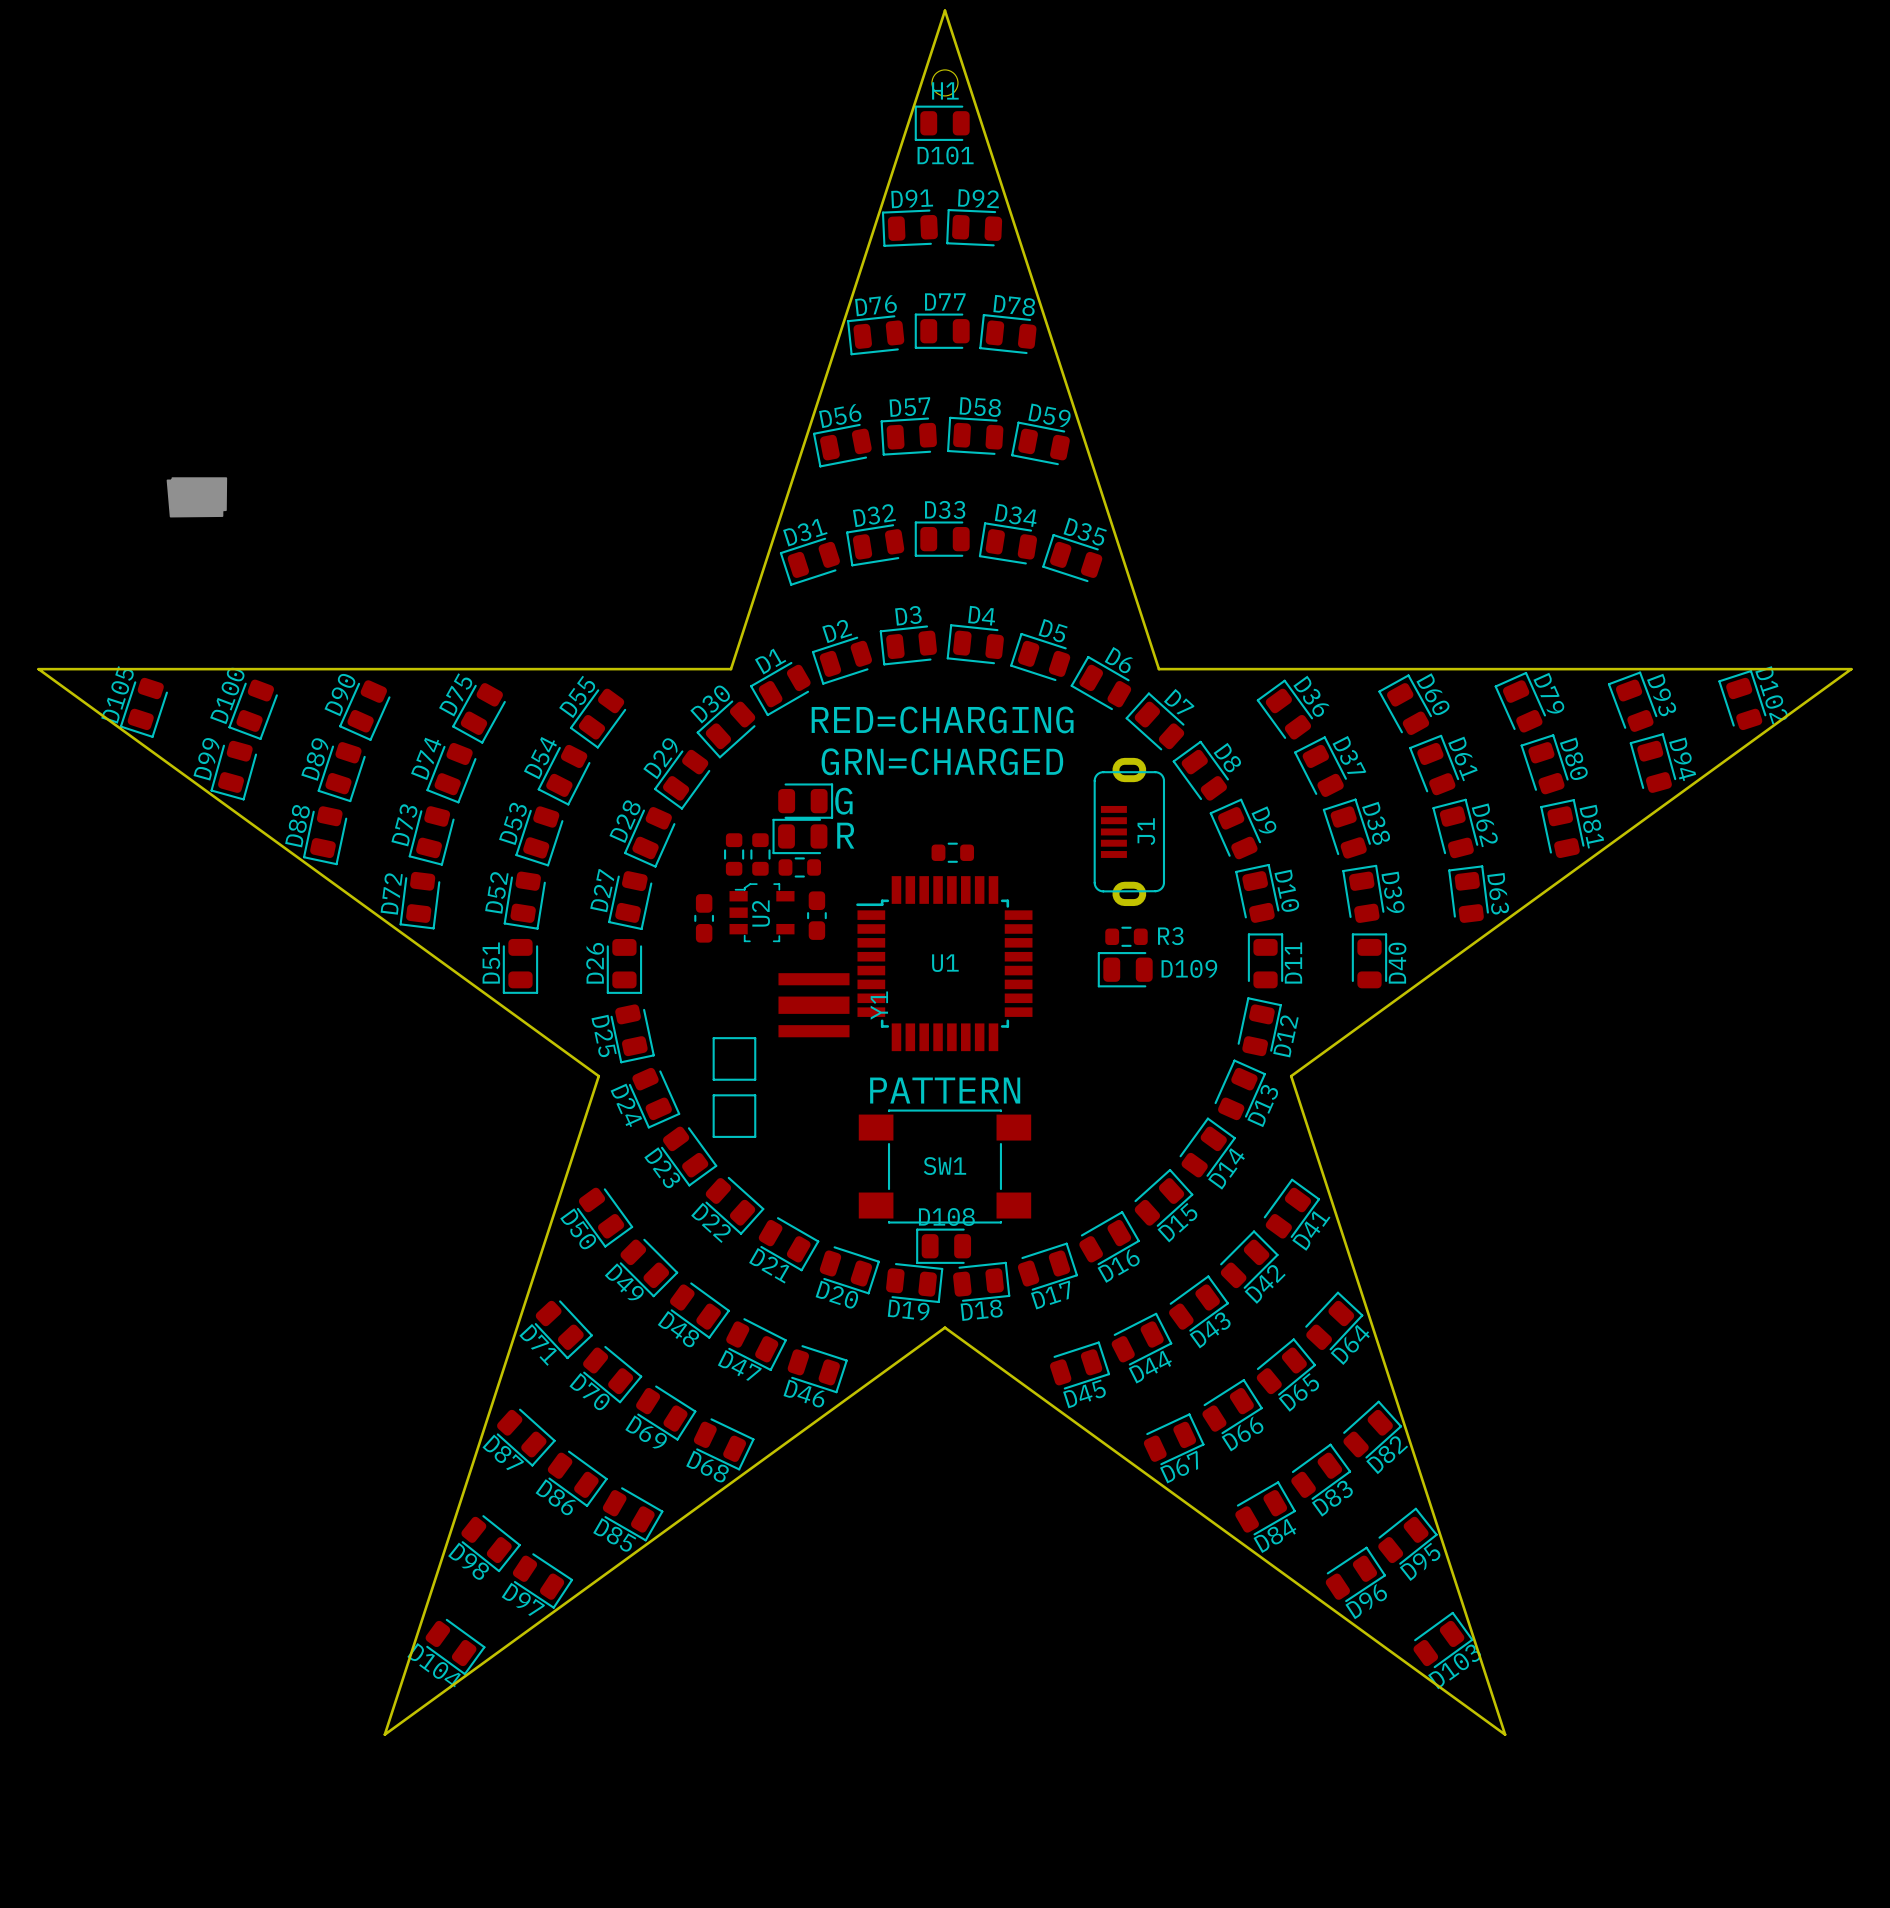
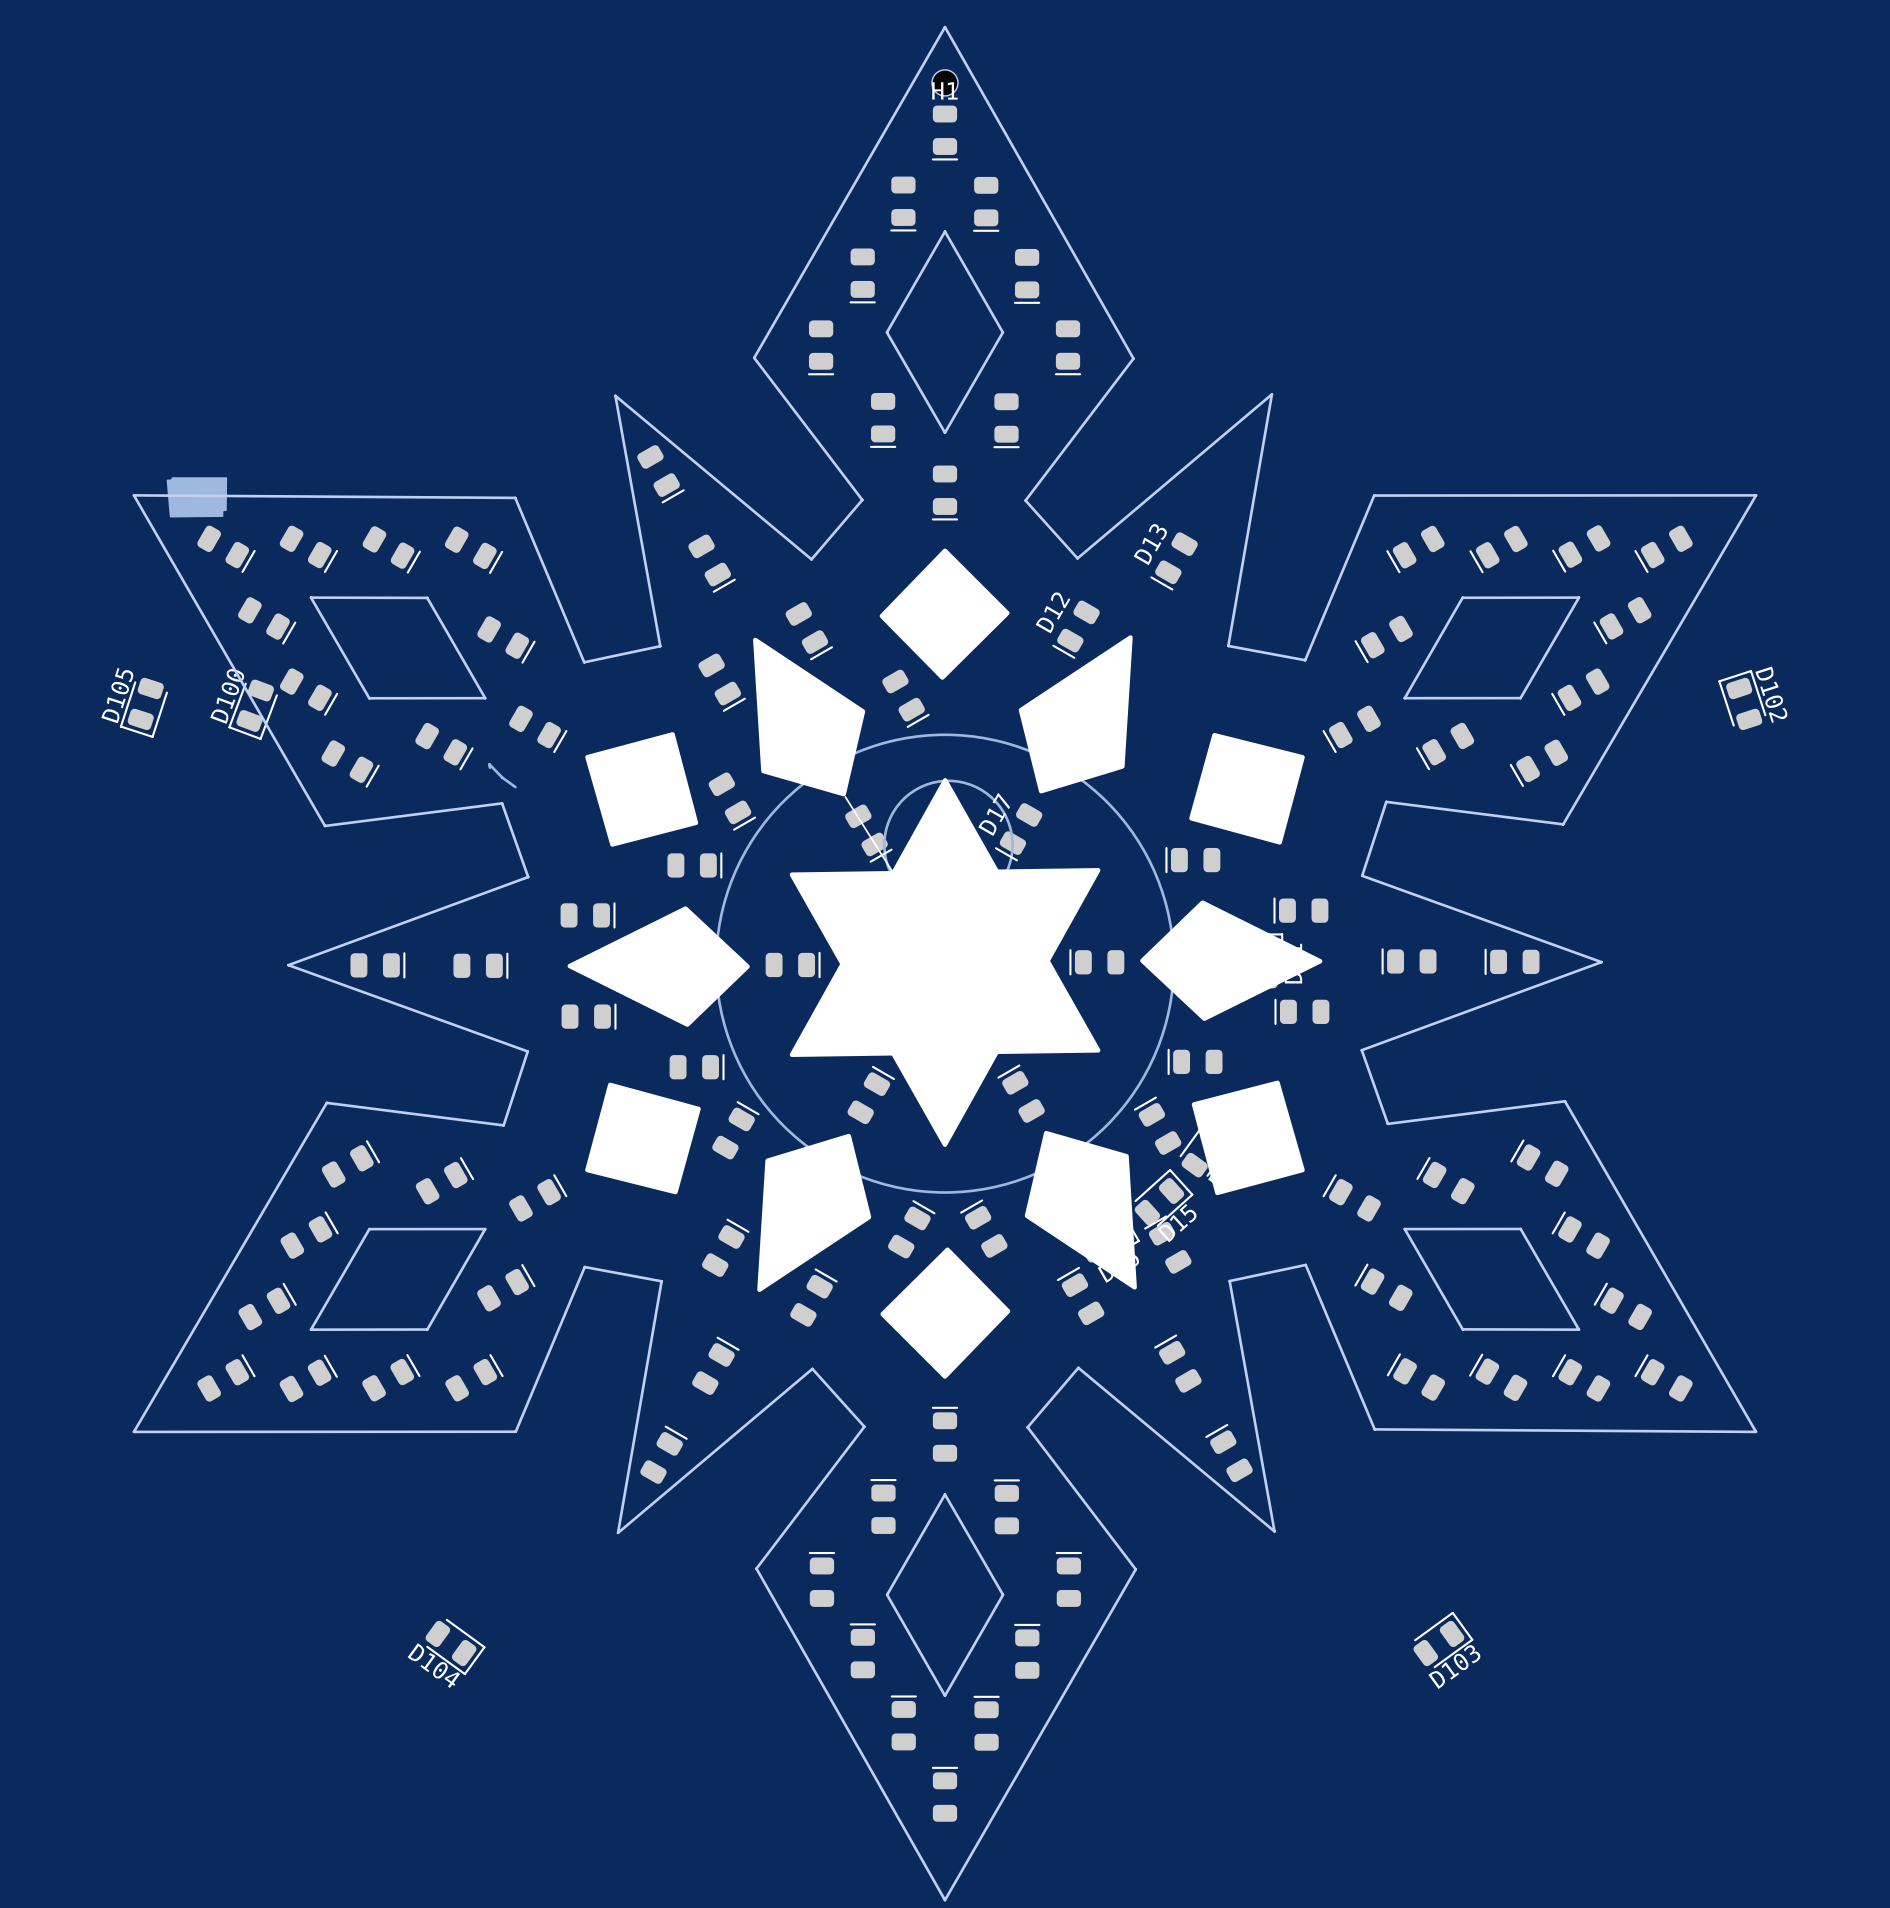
board edge: (944, 10) (1158, 669) (1851, 669) (1291, 1076) (1505, 1734) (944, 1327) (384, 1734) (598, 1076) (38, 669) (731, 669) (944, 10) -> (944, 27) (754, 357) (862, 499) (811, 559) (615, 395) (660, 646) (584, 662) (515, 497) (133, 495) (325, 825) (502, 803) (528, 877) (288, 965) (527, 1051) (503, 1125) (326, 1102) (133, 1431) (515, 1431) (584, 1267) (661, 1281) (618, 1532) (812, 1368) (864, 1426) (756, 1568) (944, 1900) (1135, 1569) (1027, 1427) (1078, 1367) (1274, 1531) (1229, 1281) (1305, 1264) (1374, 1429) (1756, 1431) (1564, 1101) (1387, 1123) (1361, 1050) (1601, 962) (1362, 875) (1386, 801) (1563, 824) (1756, 495) (1374, 495) (1305, 660) (1228, 645) (1271, 394) (1077, 558) (1025, 500) (1133, 358) (944, 27)
D101: (942, 123) -> none
part: none -> (944, 133)
part: none -> (903, 204)
part: none -> (986, 204)
D92: (974, 227) -> none
D91: (909, 228) -> none
board edge: none -> (944, 231) (1002, 332) (944, 432) (886, 332) (944, 231)
part: none -> (862, 275)
part: none -> (1027, 276)
D77: (942, 331) -> none
D78: (1007, 334) -> none
D76: (875, 335) -> none
part: none -> (821, 347)
part: none -> (1068, 347)
part: none -> (883, 420)
part: none -> (1006, 420)
D58: (975, 435) -> none
D57: (908, 436) -> none
D59: (1040, 443) -> none
D56: (842, 445) -> none
part: none -> (660, 474)
part: none -> (944, 492)
D33: (942, 539) -> none
D34: (1007, 543) -> none
D32: (875, 545) -> none
drawing: none -> [567, 548, 1323, 1379]
part: none -> (1581, 548)
part: none -> (226, 549)
part: none -> (308, 549)
part: none -> (391, 549)
part: none -> (1415, 549)
part: none -> (1498, 549)
part: none -> (1663, 549)
part: none -> (474, 550)
D35: (1072, 558) -> none
D31: (809, 561) -> none
part: none -> (712, 563)
board edge: none -> (310, 597) (427, 597) (485, 698) (369, 698) (310, 597)
board edge: none -> (1462, 597) (1404, 698) (1520, 698) (1578, 597) (1462, 597)
part: none -> (267, 620)
part: none -> (1622, 620)
part: none -> (809, 631)
part: none -> (506, 639)
part: none -> (1383, 639)
D4: (975, 644) -> none
D3: (908, 645) -> none
D5: (1040, 657) -> none
D2: (841, 660) -> none
part: none -> (722, 682)
D6: (1100, 683) -> none
D1: (780, 689) -> none
part: none -> (309, 692)
part: none -> (1580, 692)
part: none -> (905, 698)
D93: (1632, 701) -> none
D79: (1520, 702) -> none
D60: (1405, 704) -> none
D36: (1284, 709) -> none
D90: (364, 710) -> none
D75: (479, 713) -> none
D55: (598, 718) -> none
text: RED=CHARGING (942, 719) -> none
D7: (1155, 721) -> none
part: none -> (538, 729)
D30: (726, 729) -> none
part: none -> (1351, 729)
part: none -> (444, 746)
part: none -> (1445, 746)
text: GRN=CHARGED (942, 761) -> none
part: none -> (1538, 763)
D94: (1653, 763) -> none
part: none -> (350, 764)
D80: (1544, 764) -> none
D61: (1434, 765) -> none
D37: (1320, 766) -> none
line: none -> (489, 767) (489, 764) (502, 777) (515, 787)
D99: (233, 770) -> none
D8: (1200, 770) -> none
D89: (341, 772) -> none
D74: (451, 773) -> none
D54: (564, 775) -> none
D29: (682, 779) -> none
line: none -> (845, 796) (891, 870)
part: none -> (732, 801)
part: (805, 801) -> none
text: G (843, 801) -> none
D38: (1346, 828) -> none
D62: (1455, 828) -> none
D81: (1562, 828) -> none
D9: (1235, 829) -> none
J1: (1129, 831) -> none
part: none -> (868, 833)
D88: (325, 835) -> none
D73: (431, 835) -> none
text: R (845, 835) -> none
D53: (539, 836) -> none
part: (799, 836) -> none
D28: (649, 837) -> none
part: (952, 852) -> none
part: (734, 854) -> none
part: (760, 854) -> none
part: none -> (1192, 860)
part: none -> (694, 865)
part: (799, 867) -> none
D10: (1257, 893) -> none
D39: (1363, 893) -> none
D63: (1468, 894) -> none
D72: (419, 900) -> none
D52: (524, 900) -> none
D27: (630, 900) -> none
part: none -> (1300, 910)
U2: (762, 912) -> none
part: none -> (588, 915)
part: (816, 915) -> none
part: (704, 918) -> none
R3: (1126, 936) -> none
D40: (1369, 960) -> none
part: none -> (1409, 961)
part: none -> (1512, 961)
part: none -> (1096, 962)
U1: (944, 963) -> none
part: none -> (793, 964)
part: none -> (377, 965)
part: none -> (480, 965)
D51: (520, 966) -> none
D26: (624, 966) -> none
D109: (1125, 969) -> none
D12 footprint: [1237, 997, 1282, 1057] -> [1052, 600, 1100, 659]
Y1: (813, 1005) -> none
part: none -> (1301, 1011)
part: none -> (589, 1016)
D25: (632, 1033) -> none
D12 name position: D12 (1285, 1036) -> D12 (1053, 612)
part: (734, 1058) -> none
D13 footprint: [1214, 1059, 1266, 1121] -> [1150, 532, 1198, 591]
part: none -> (1195, 1061)
part: none -> (697, 1067)
text: PATTERN (945, 1090) -> none
part: none -> (1021, 1093)
part footprint: [712, 1094, 757, 1138] -> [712, 1101, 760, 1160]
part: none -> (871, 1094)
D24: (654, 1098) -> none
D13 name position: D13 (1262, 1106) -> D13 (1150, 544)
part: none -> (1157, 1125)
D23: (689, 1156) -> none
part: none -> (351, 1163)
part: none -> (1539, 1163)
SW1: (944, 1166) -> none
part: none -> (444, 1180)
part: none -> (1445, 1180)
part: none -> (538, 1197)
part: none -> (1351, 1197)
D22: (734, 1205) -> none
D41: (1291, 1208) -> none
D50: (605, 1217) -> none
part: none -> (983, 1228)
board edge: none -> (1520, 1228) (1404, 1229) (1462, 1329) (1578, 1329) (1520, 1228)
board edge: none -> (369, 1229) (310, 1329) (427, 1329) (485, 1229) (369, 1229)
part: none -> (911, 1229)
part: none -> (309, 1235)
part: none -> (1580, 1235)
D17 footprint: [1017, 1242, 1078, 1291] -> [994, 803, 1043, 862]
D21: (789, 1244) -> none
part: none -> (1167, 1244)
D108: (943, 1246) -> none
part: none -> (725, 1247)
D42: (1249, 1259) -> none
D49: (649, 1268) -> none
D20: (849, 1270) -> none
D18: (981, 1281) -> none
D19: (914, 1283) -> none
part: none -> (506, 1287)
part: none -> (1383, 1287)
D17 name position: D17 (1050, 1294) -> D17 (994, 814)
part: none -> (1080, 1296)
part: none -> (813, 1297)
D43: (1198, 1303) -> none
part: none -> (267, 1306)
part: none -> (1622, 1306)
D48: (699, 1310) -> none
D64: (1334, 1321) -> none
D71: (563, 1329) -> none
D44: (1141, 1339) -> none
D47: (756, 1344) -> none
part: none -> (1177, 1363)
part: none -> (715, 1365)
D45: (1080, 1365) -> none
D65: (1286, 1367) -> none
D46: (817, 1369) -> none
D70: (612, 1374) -> none
part: none -> (226, 1377)
part: none -> (391, 1377)
part: none -> (474, 1377)
part: none -> (1415, 1377)
part: none -> (1498, 1377)
part: none -> (1581, 1377)
part: none -> (1663, 1377)
part: none -> (308, 1378)
D66: (1232, 1406) -> none
D69: (666, 1413) -> none
D82: (1372, 1429) -> none
part: none -> (944, 1434)
D87: (526, 1437) -> none
D67: (1174, 1439) -> none
D68: (724, 1444) -> none
part: none -> (1228, 1453)
part: none -> (664, 1454)
D83: (1321, 1471) -> none
D86: (577, 1478) -> none
board edge: none -> (944, 1494) (887, 1594) (944, 1695) (1003, 1594) (944, 1494)
part: none -> (883, 1506)
part: none -> (1006, 1506)
D84: (1265, 1508) -> none
D85: (633, 1514) -> none
D95: (1407, 1536) -> none
D98: (491, 1543) -> none
D96: (1355, 1574) -> none
part: none -> (821, 1579)
part: none -> (1068, 1579)
D97: (542, 1580) -> none
part: none -> (862, 1650)
part: none -> (1027, 1651)
part: none -> (903, 1722)
part: none -> (986, 1723)
part: none -> (944, 1794)

